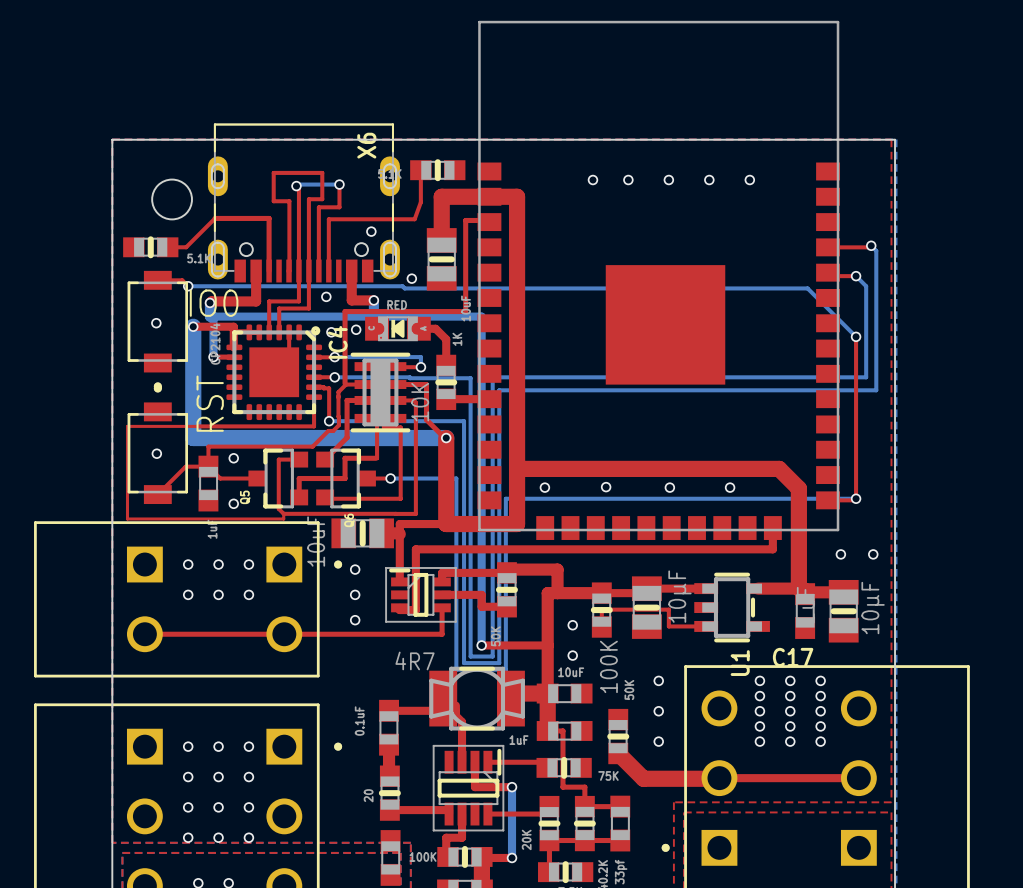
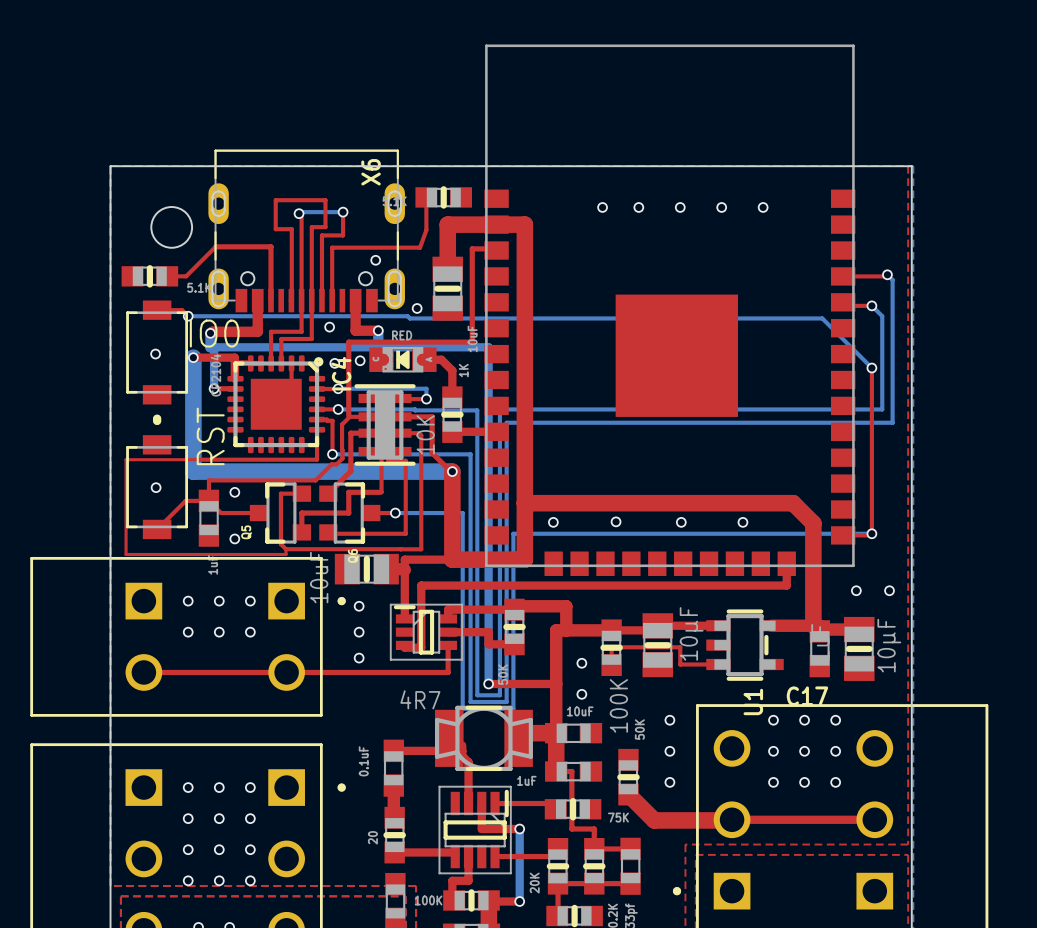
via: (759, 696) -> none
via: (790, 696) -> none
via: (820, 696) -> none
via: (759, 726) -> none
via: (790, 726) -> none
via: (820, 726) -> none

